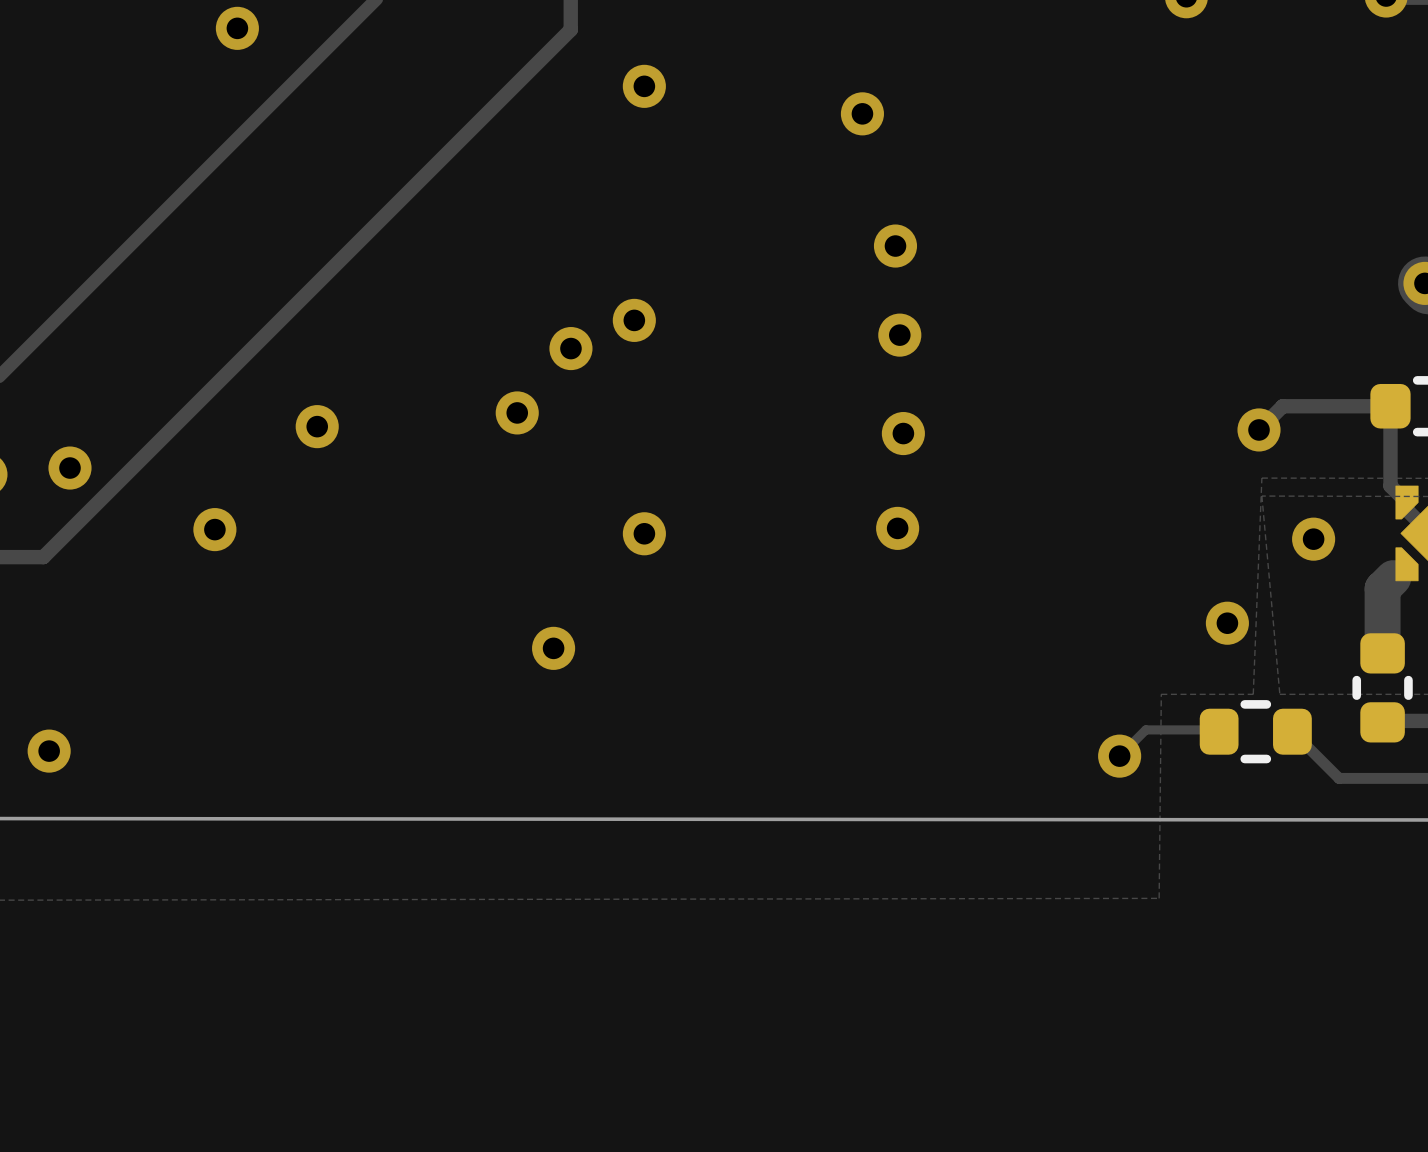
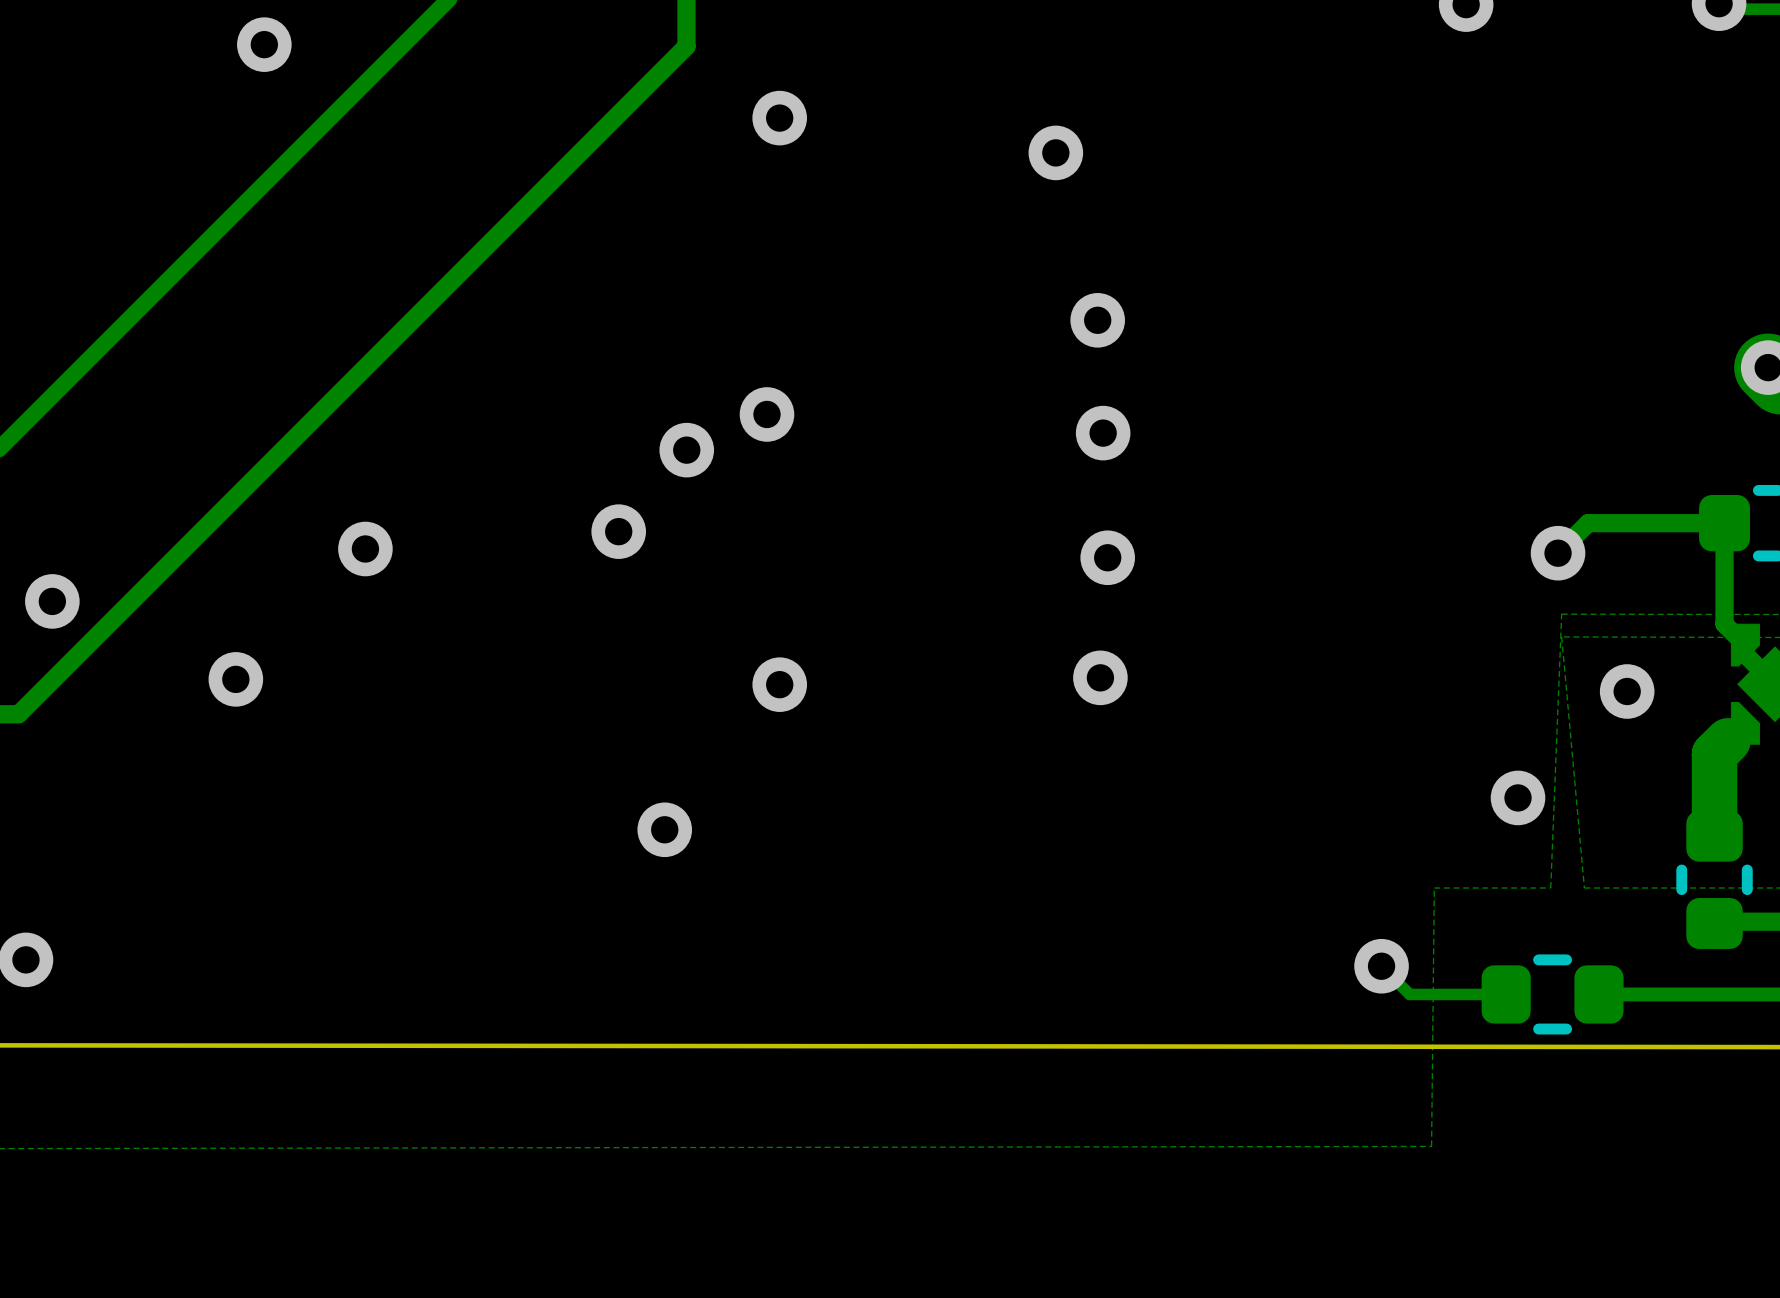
track: (1219, 731) (1217, 729) (1145, 729) (1119, 756) -> (1506, 994) (1409, 994) (1381, 966)
part position: (1255, 731) -> (1552, 994)
track: (1292, 731) (1339, 778) -> (1598, 994) (1659, 994)

